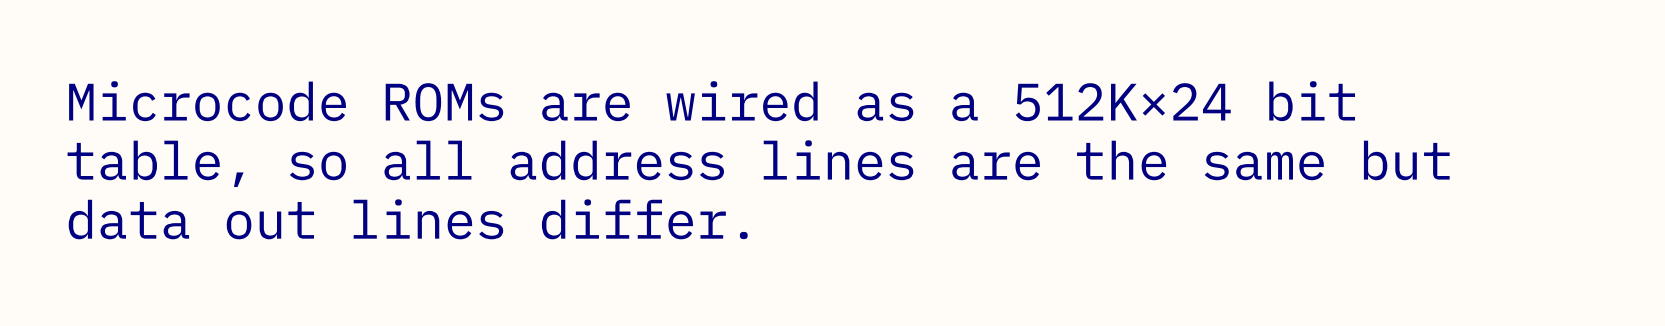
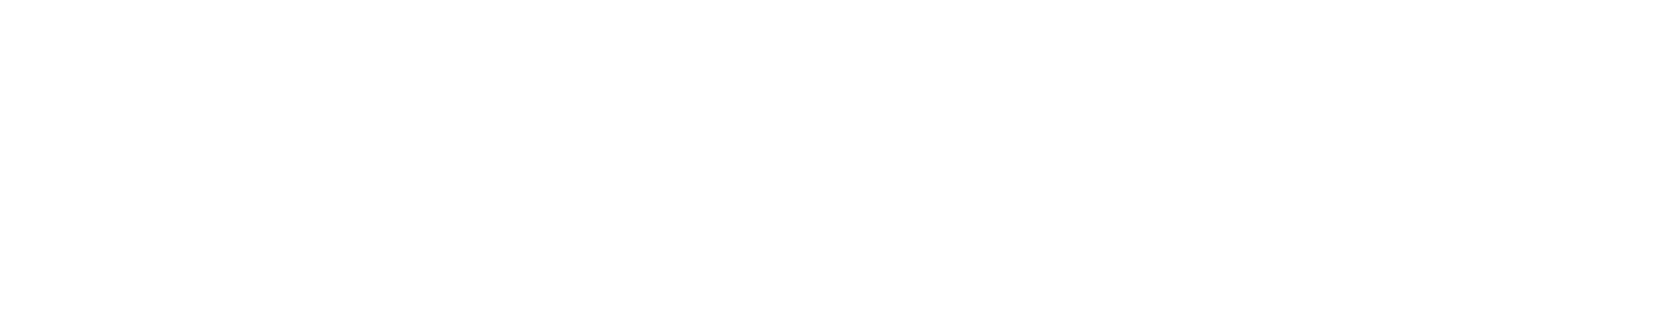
text: Microcode ROMs are wired as a 512K×24 bit (712, 101) -> none
text: table, so all address lines are the same but (758, 163) -> none
text: data out lines differ. (408, 219) -> none

